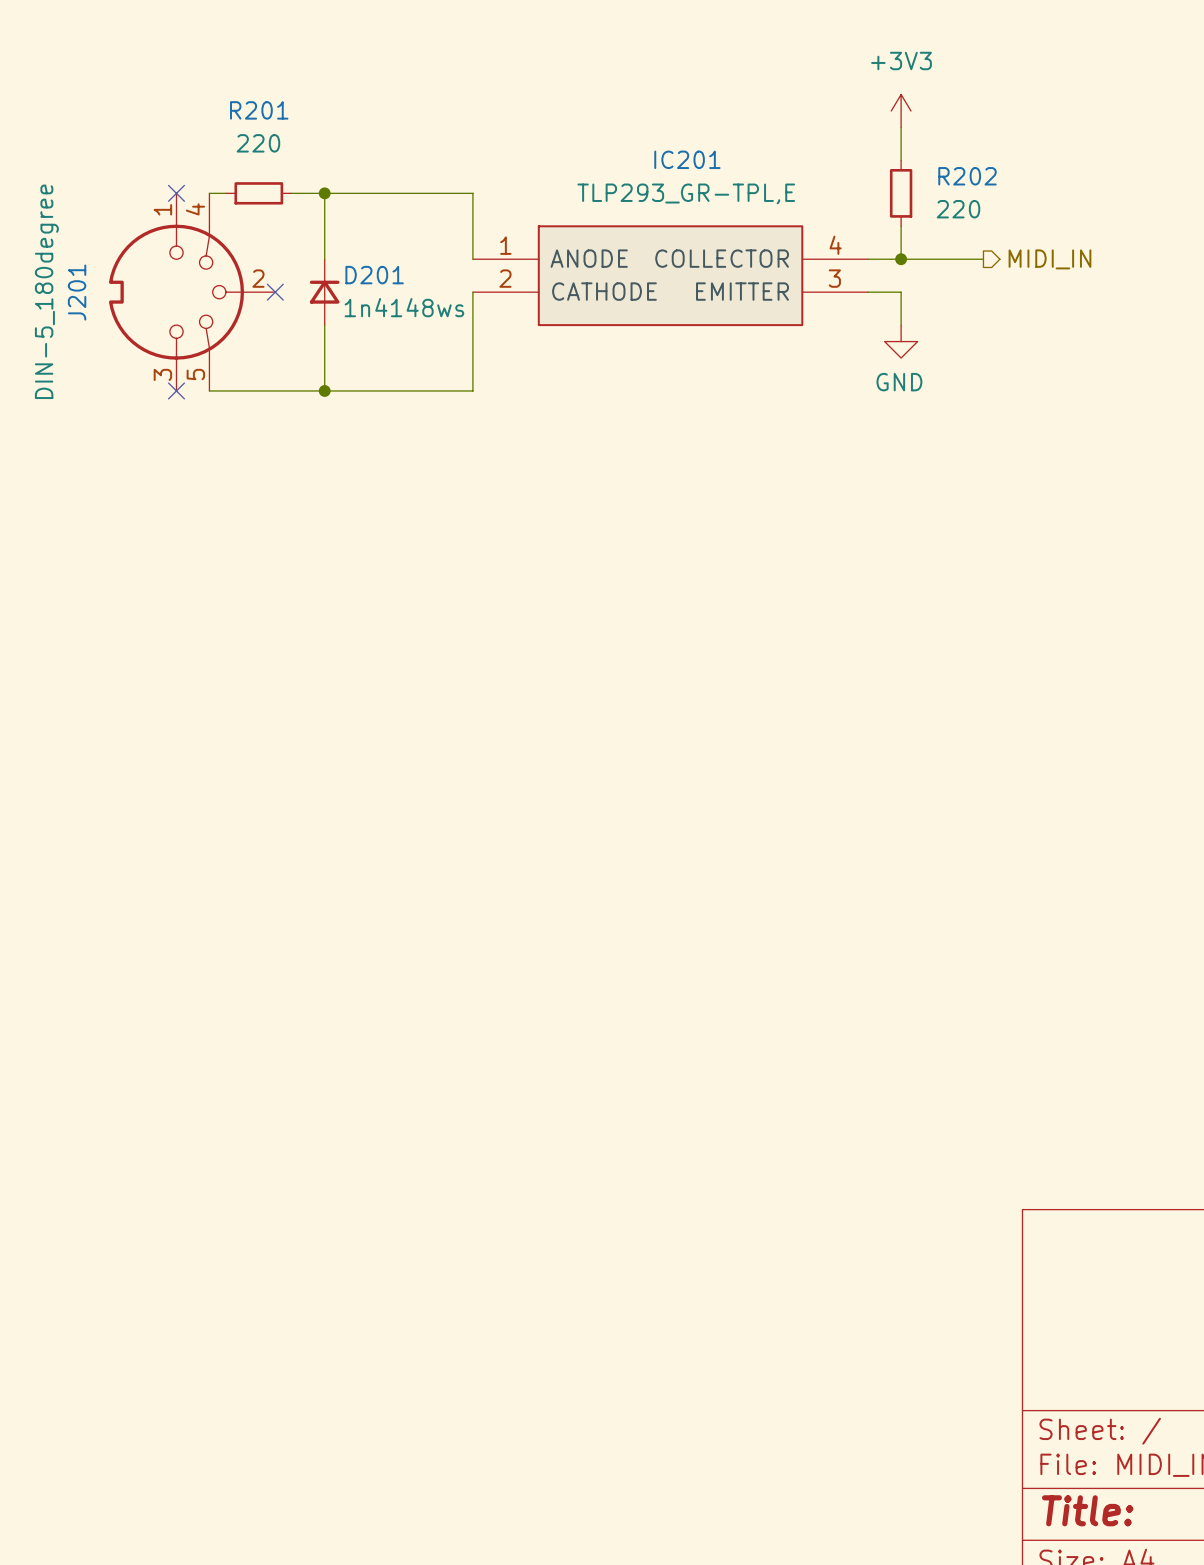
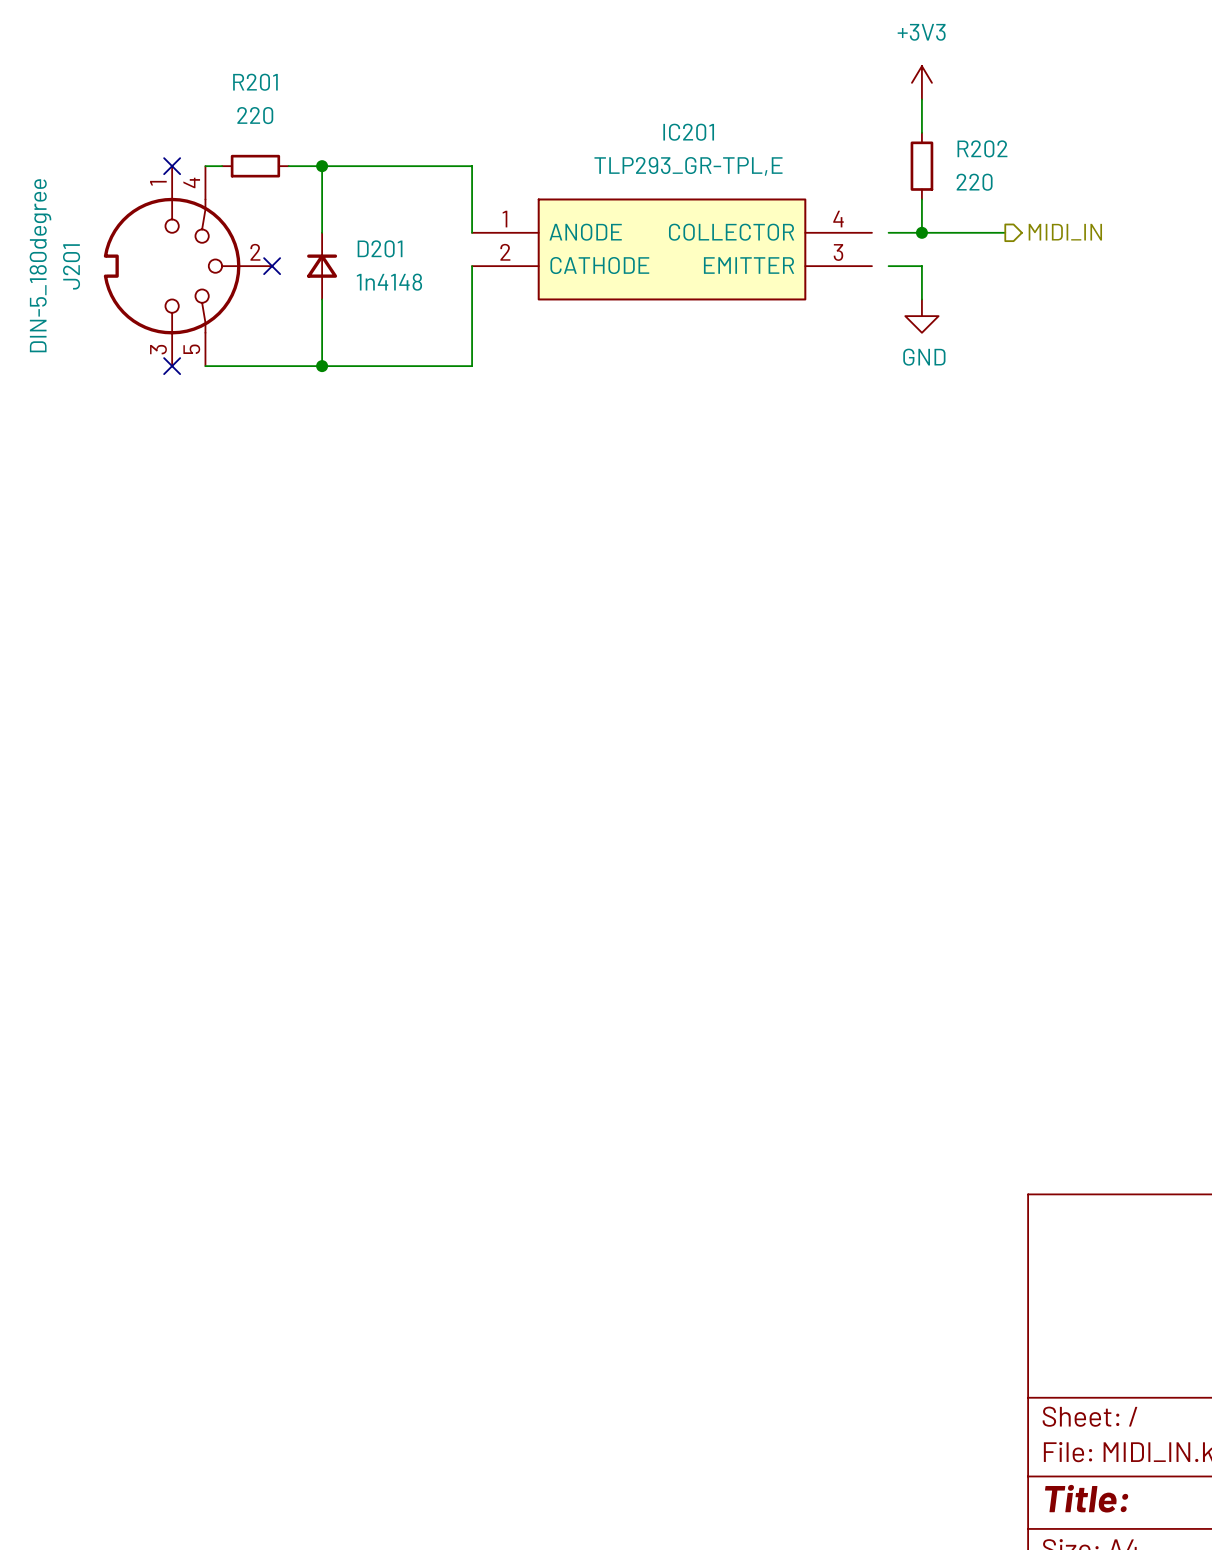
power symbol position: +3V3 (901, 111) -> +3V3 (921, 82)
wire: (901, 127) (901, 160) -> (921, 99) (921, 132)
R202 position: (901, 193) -> (921, 166)
wire: (901, 226) (901, 259) -> (921, 199) (921, 232)
wire: (868, 259) (884, 259) -> (988, 232) (1005, 232)
junction position: (901, 259) -> (921, 232)
hierarchical label position: MIDI_IN (1049, 259) -> MIDI_IN (1065, 232)
D201 name position: D201 (374, 275) -> D201 (380, 248)
wire: (868, 292) (884, 292) -> none
wire: (901, 292) (901, 325) -> (905, 266) (921, 266) (921, 299)
D201 value: 1n4148ws (404, 307) -> 1n4148 (389, 282)
power symbol position: GND (901, 341) -> GND (921, 316)

